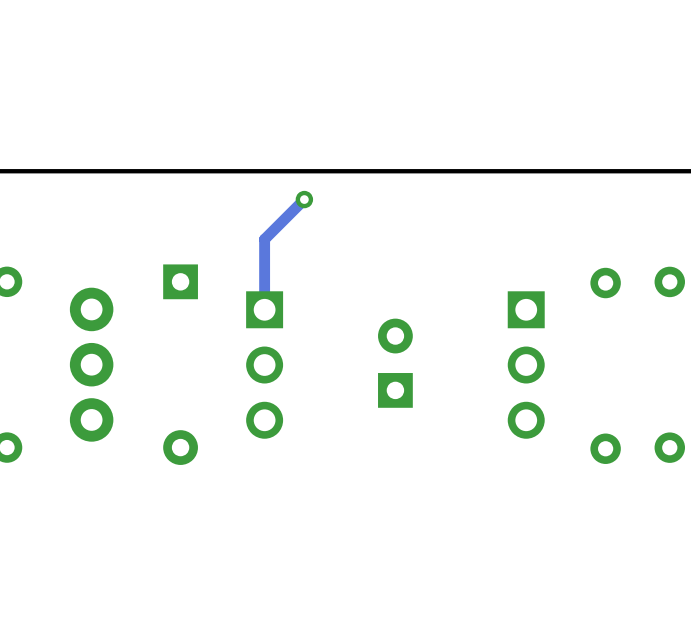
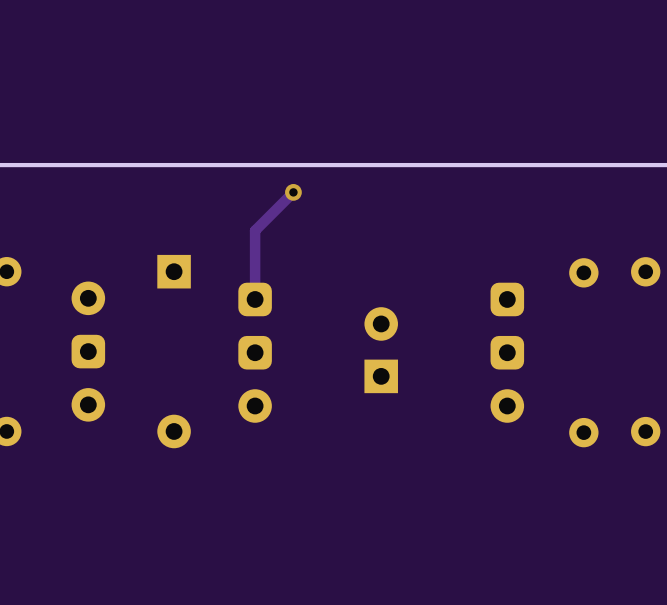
part footprint: [69, 287, 114, 442] -> [71, 281, 106, 422]
part footprint: [246, 291, 284, 439] -> [238, 282, 272, 423]
part footprint: [507, 291, 545, 439] -> [490, 282, 525, 423]

